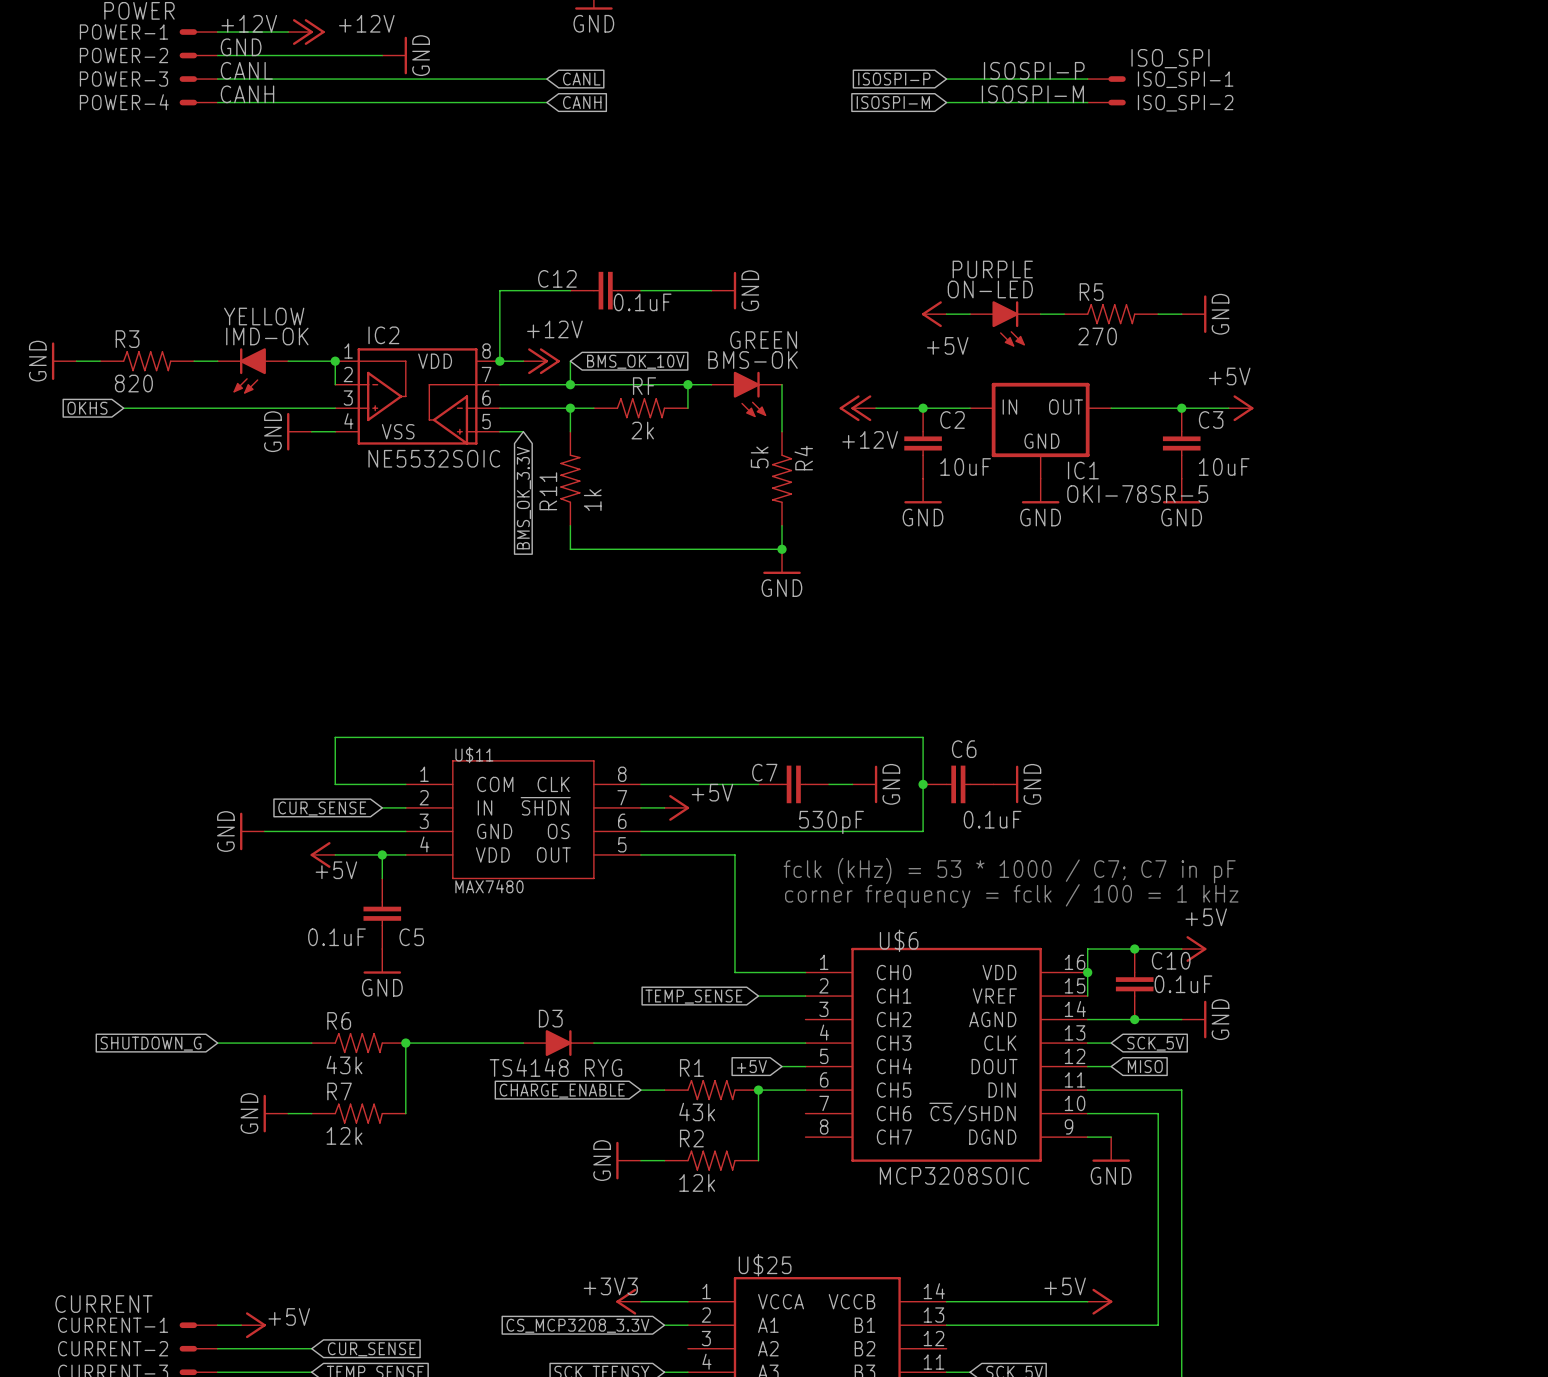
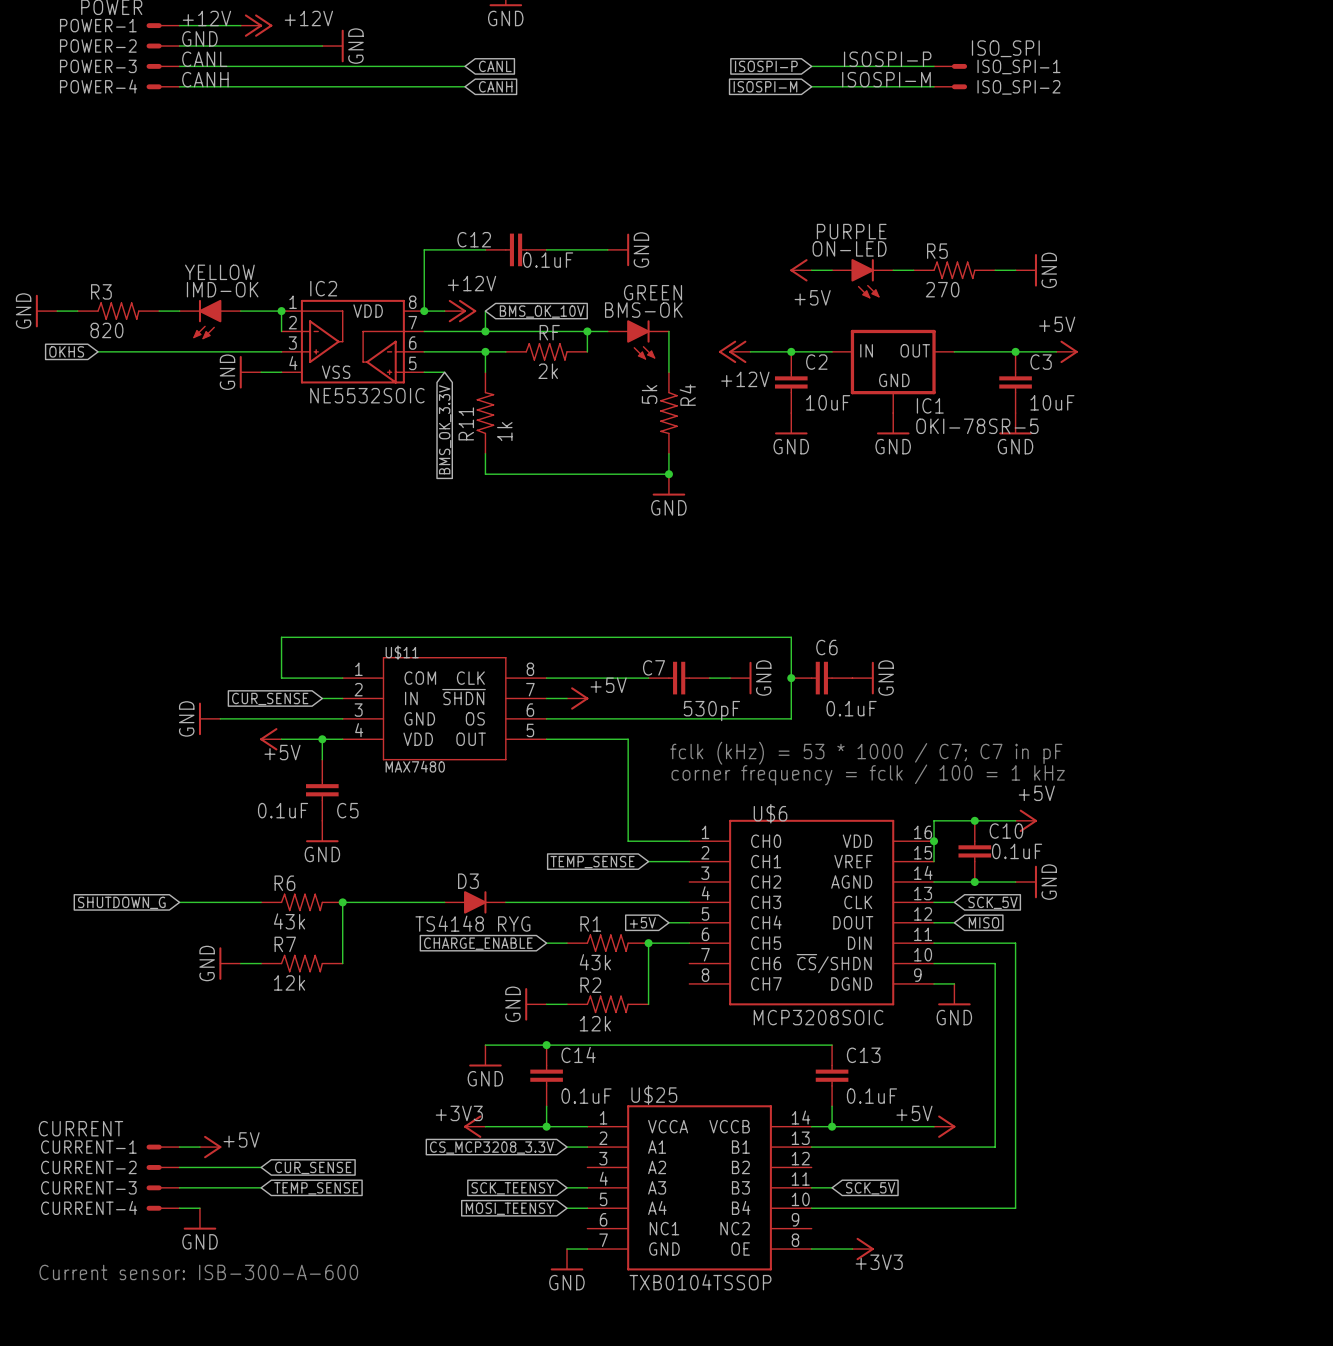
wire: none -> (485, 1045) (832, 1045)
junction: none -> (546, 1045)
power symbol: none -> GND (485, 1055)
C14: none -> 0.1uF (546, 1075)
C13: none -> 0.1uF (832, 1075)
wire: none -> (546, 1106) (546, 1126) (485, 1126)
wire: none -> (832, 1106) (832, 1126)
power symbol position: +3V3 (628, 1301) -> +3V3 (474, 1126)
junction: none -> (546, 1126)
junction: none -> (832, 1126)

